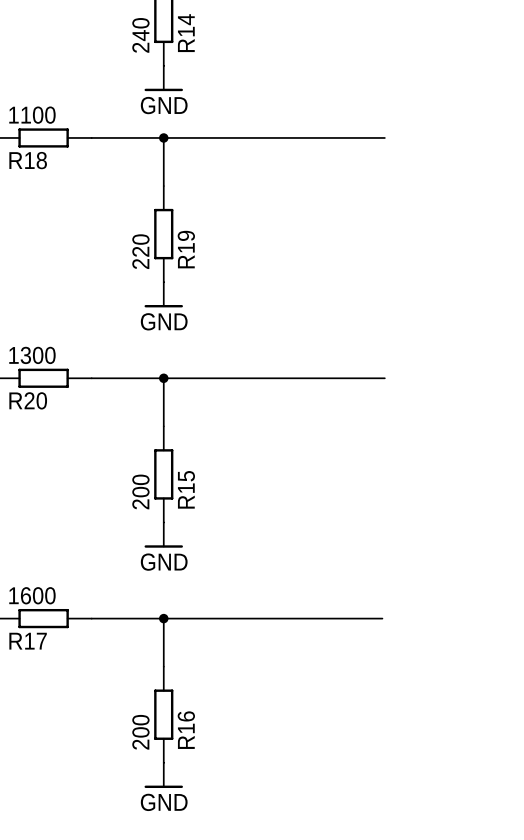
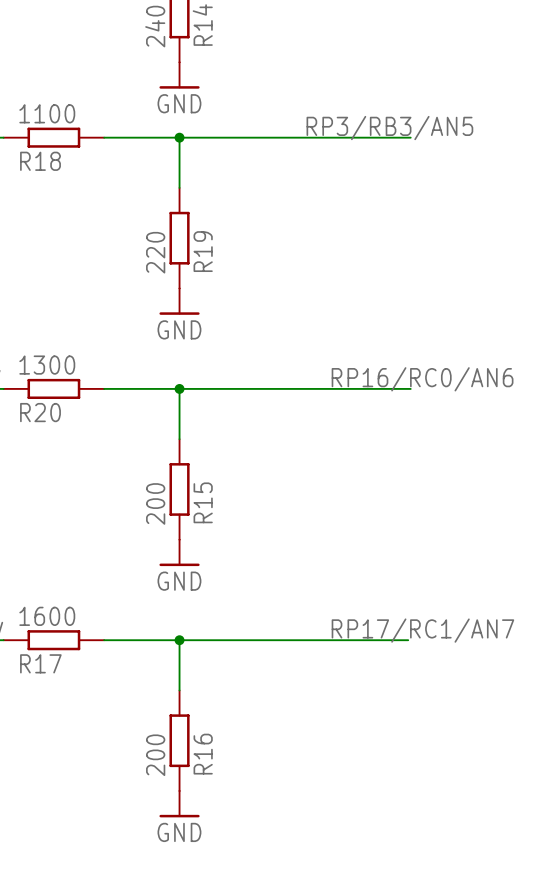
label: none -> RP3/RB3/AN5 (389, 128)
label: none -> RP16/RC0/AN6 (422, 379)
label: none -> RP17/RC1/AN7 (422, 630)

